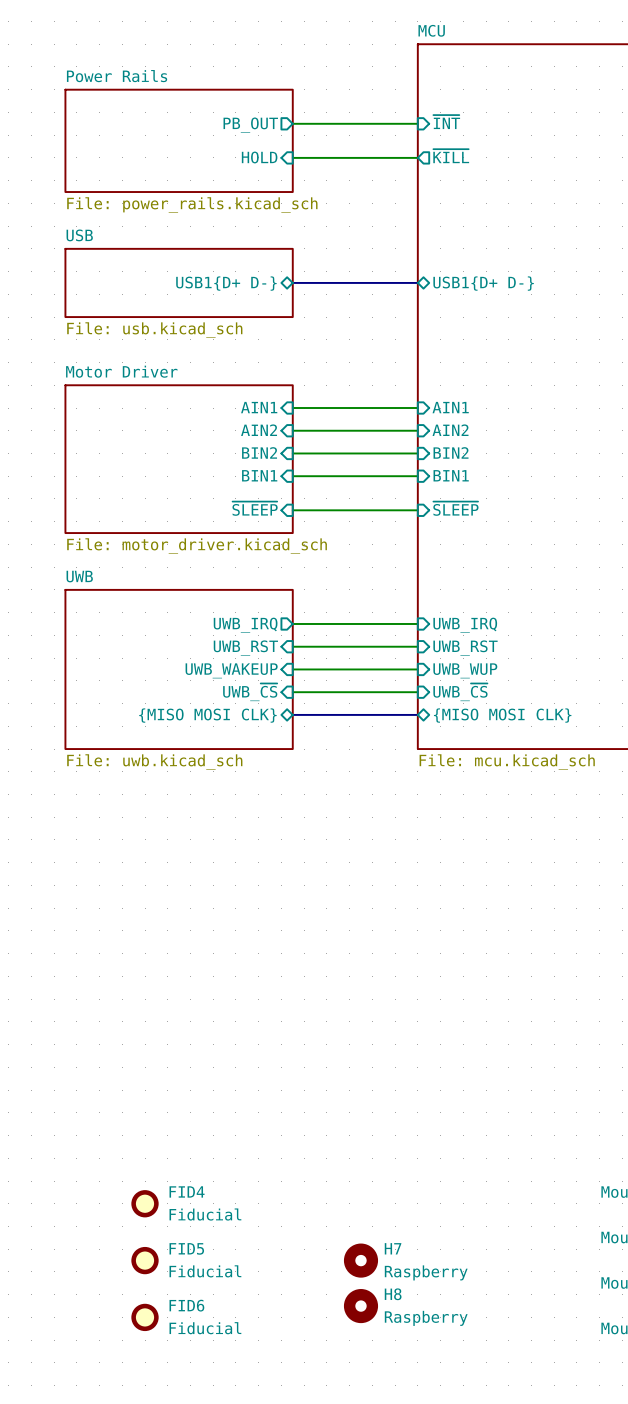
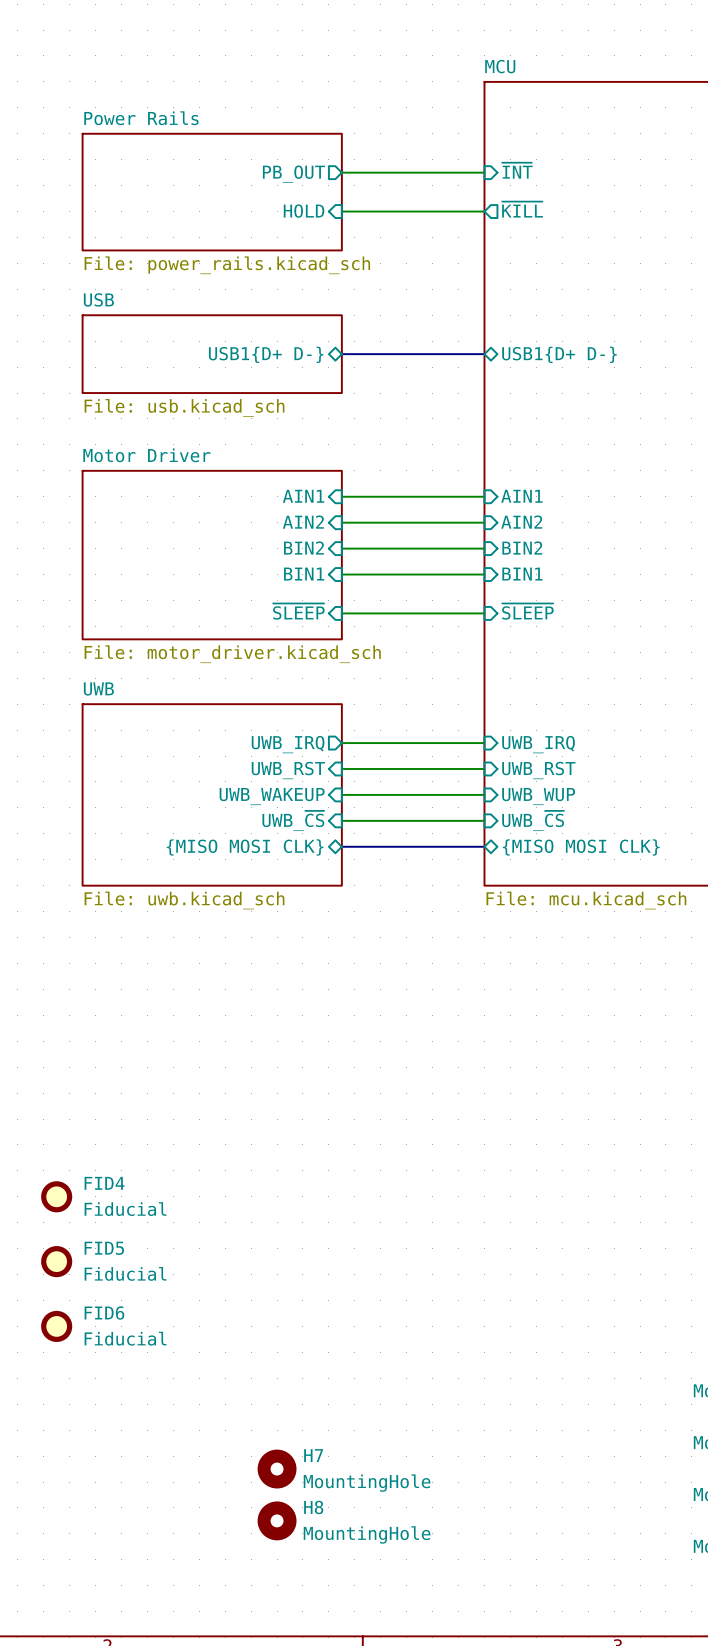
FID4 position: (145, 1203) -> (56, 1196)
FID5 position: (145, 1260) -> (56, 1261)
H7 position: (360, 1260) -> (277, 1469)
H7 value: Raspberry (426, 1272) -> MountingHole (367, 1483)
H8 position: (360, 1306) -> (277, 1520)
FID6 position: (145, 1317) -> (56, 1326)
H8 value: Raspberry (426, 1318) -> MountingHole (367, 1534)

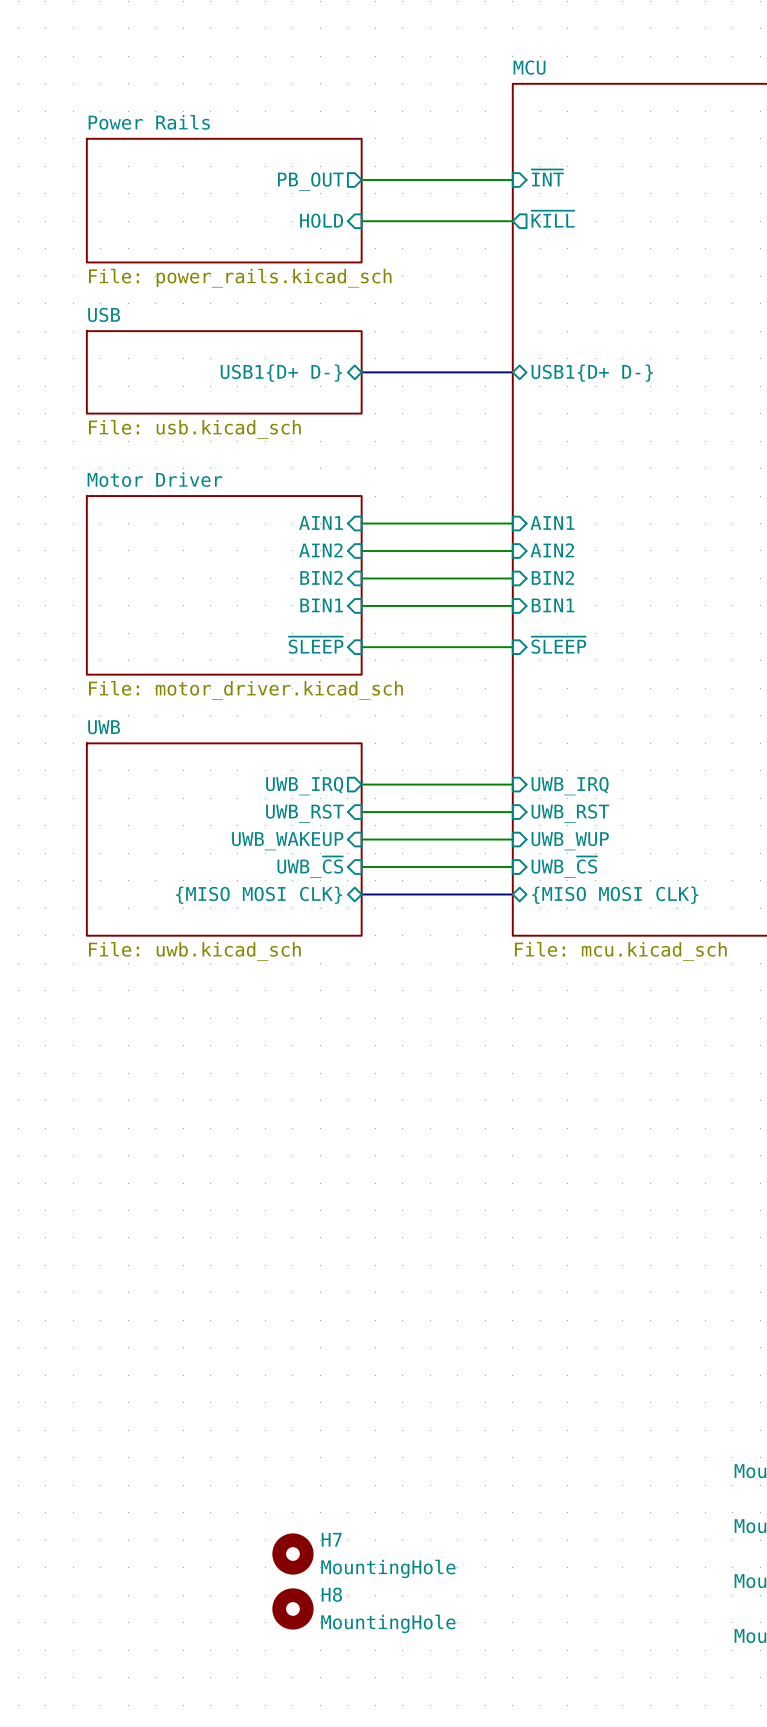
FID4: Fiducial (56, 1196) -> none
FID5: Fiducial (56, 1261) -> none
FID6: Fiducial (56, 1326) -> none

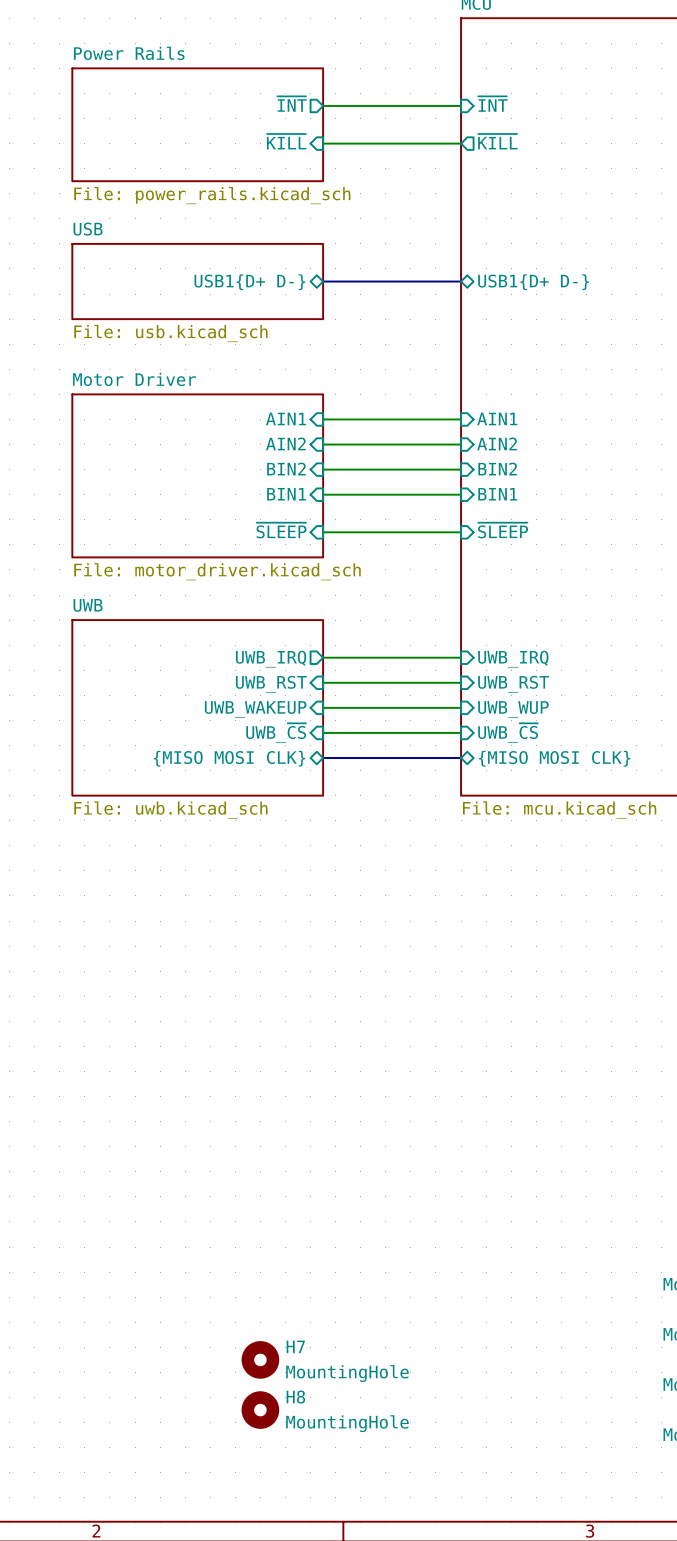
sheet pin: PB_OUT (310, 181) -> ~{INT} (292, 104)
sheet pin: HOLD (321, 220) -> ~{KILL} (286, 141)

